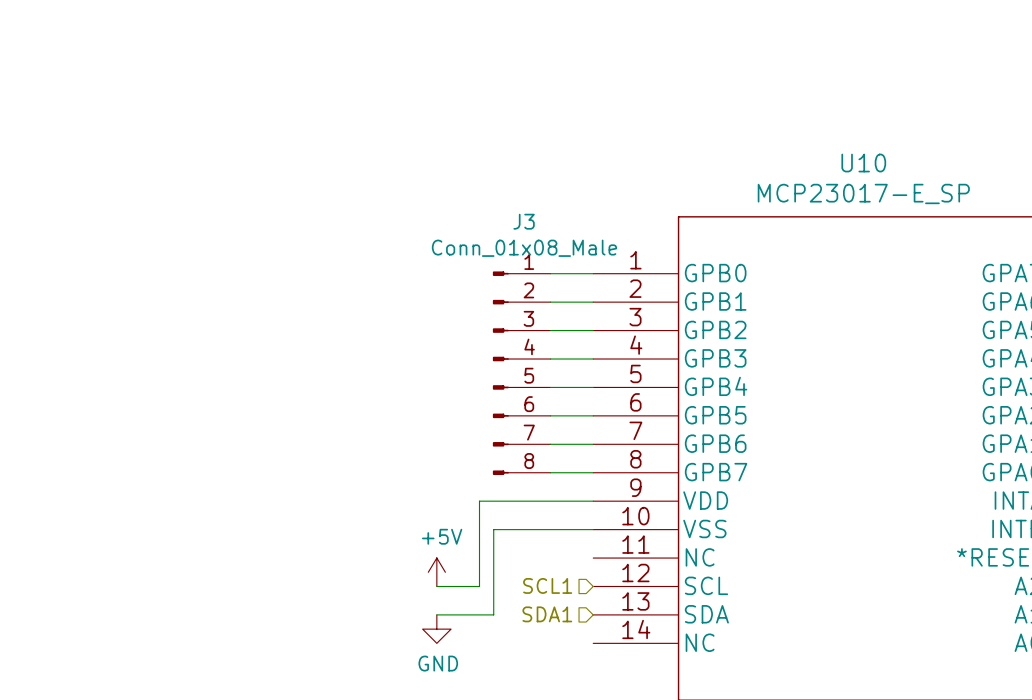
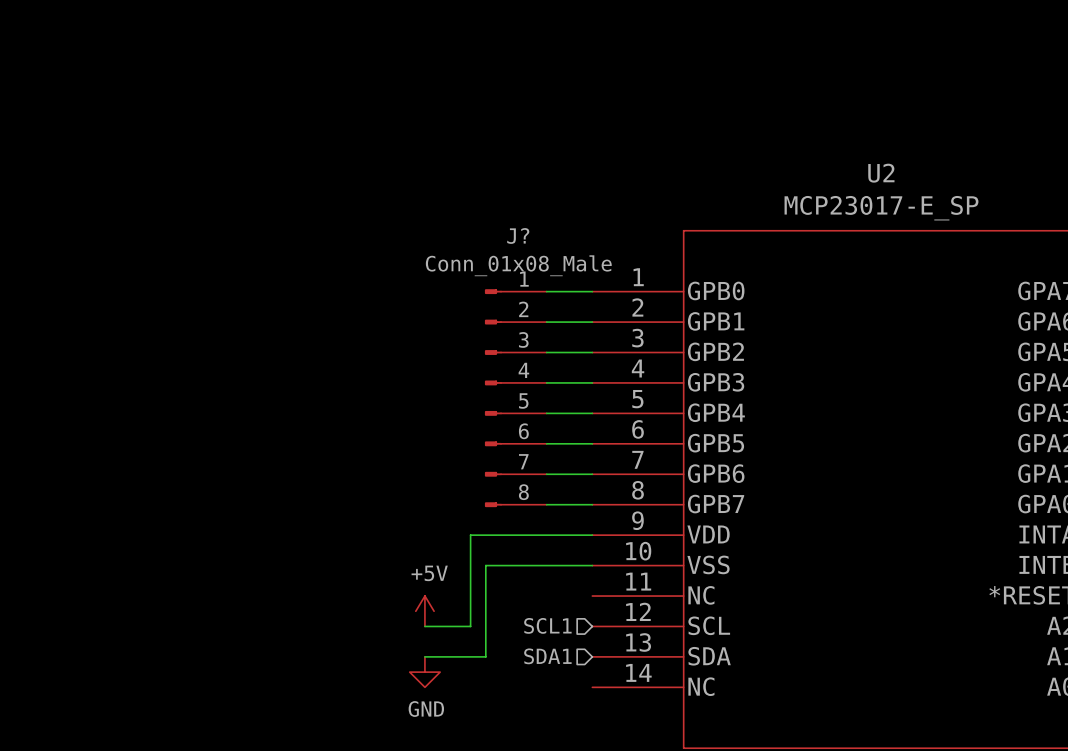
U10 name: U10 (863, 163) -> U2 (881, 173)
J3 name: J3 (524, 221) -> J? (518, 235)

